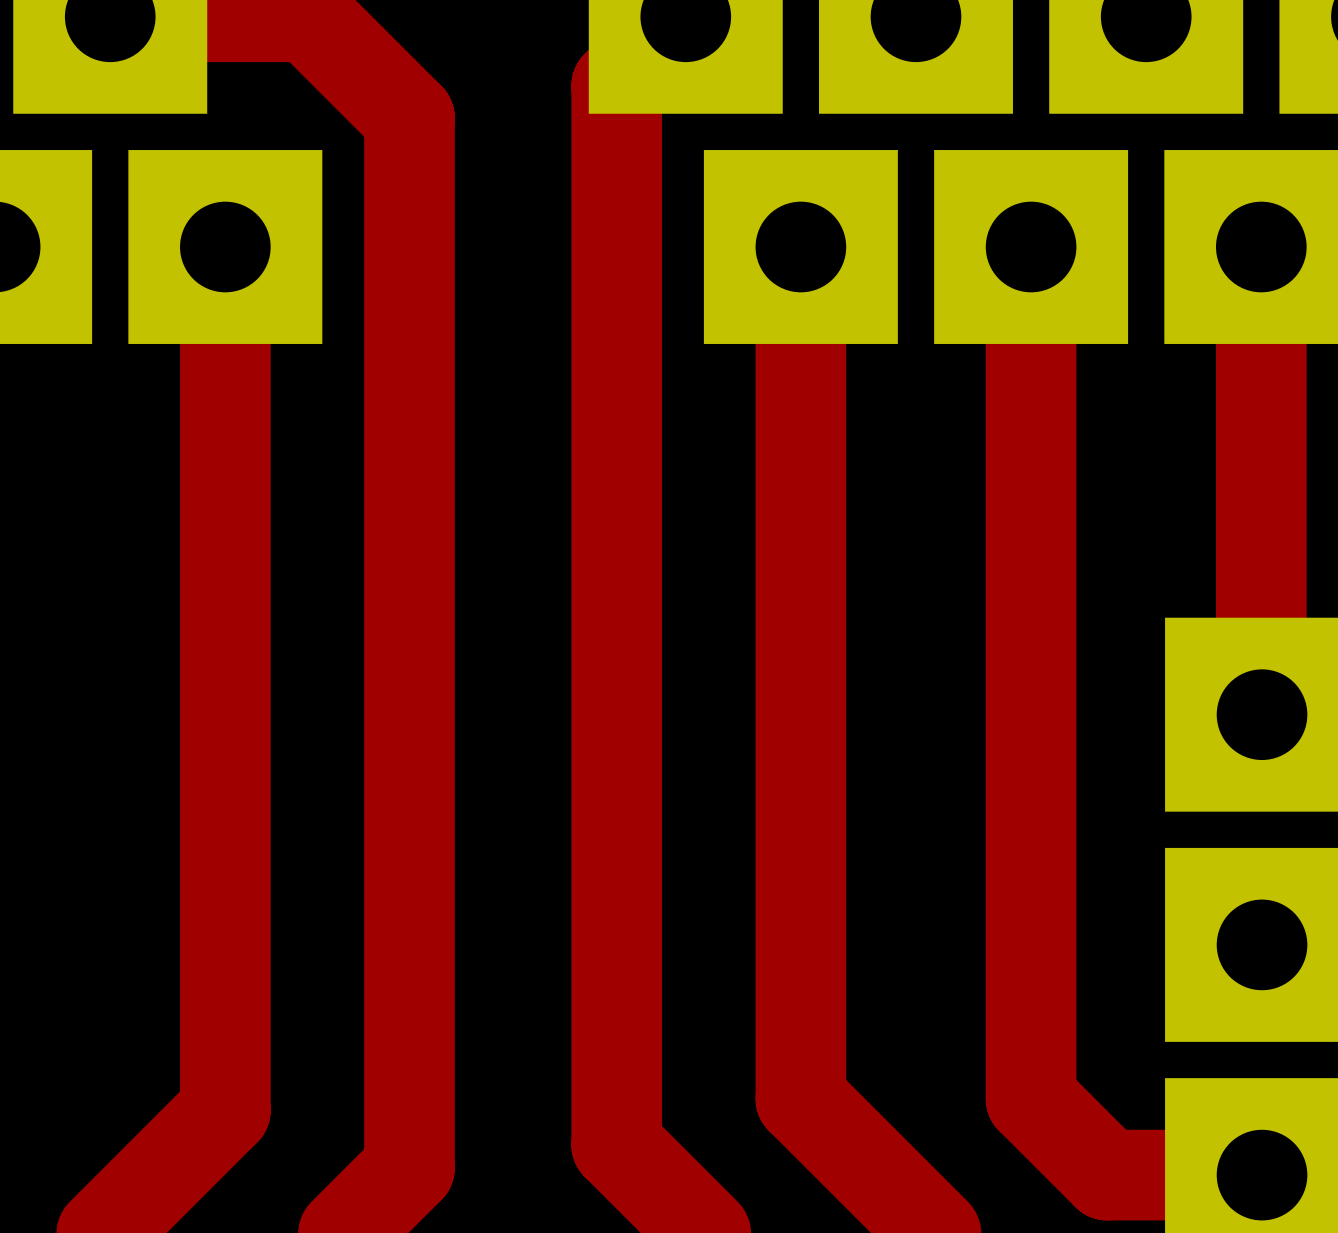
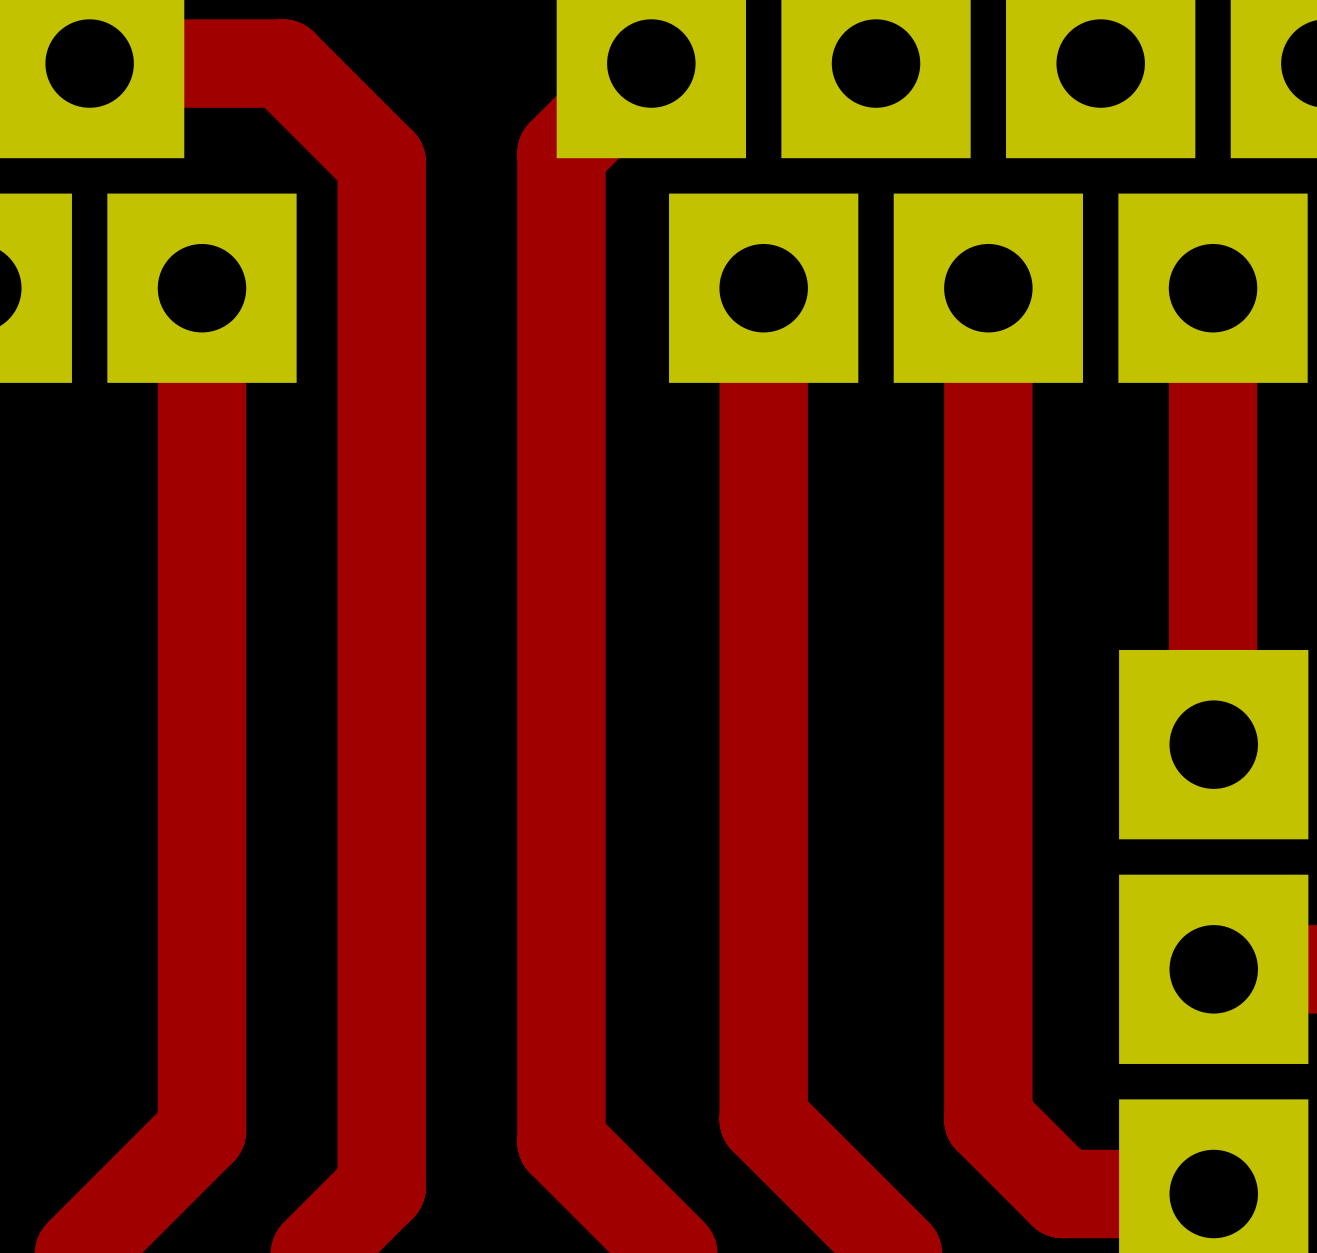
top track: (616, 85) (616, 1144) -> (583, 130) (561, 153) (561, 1141) (583, 1164)

